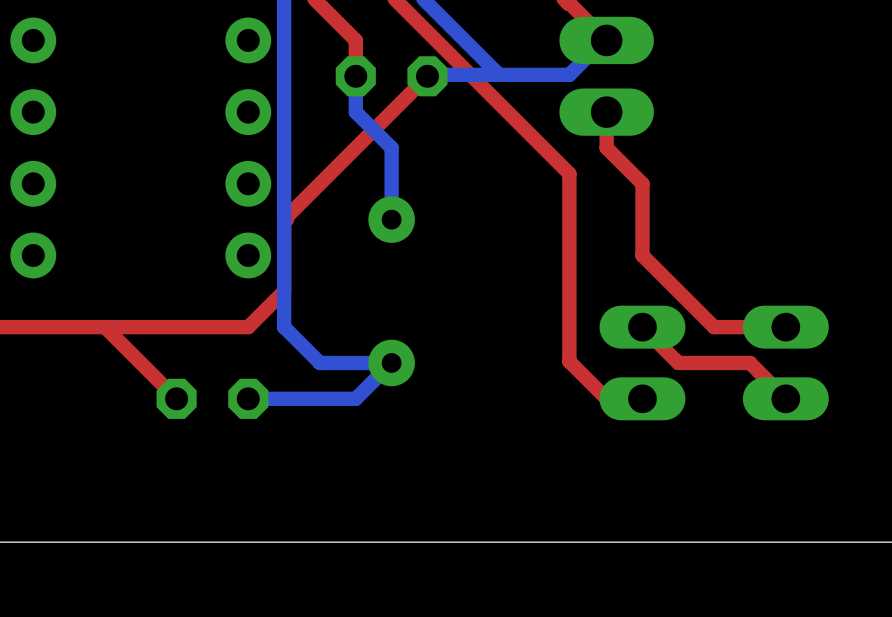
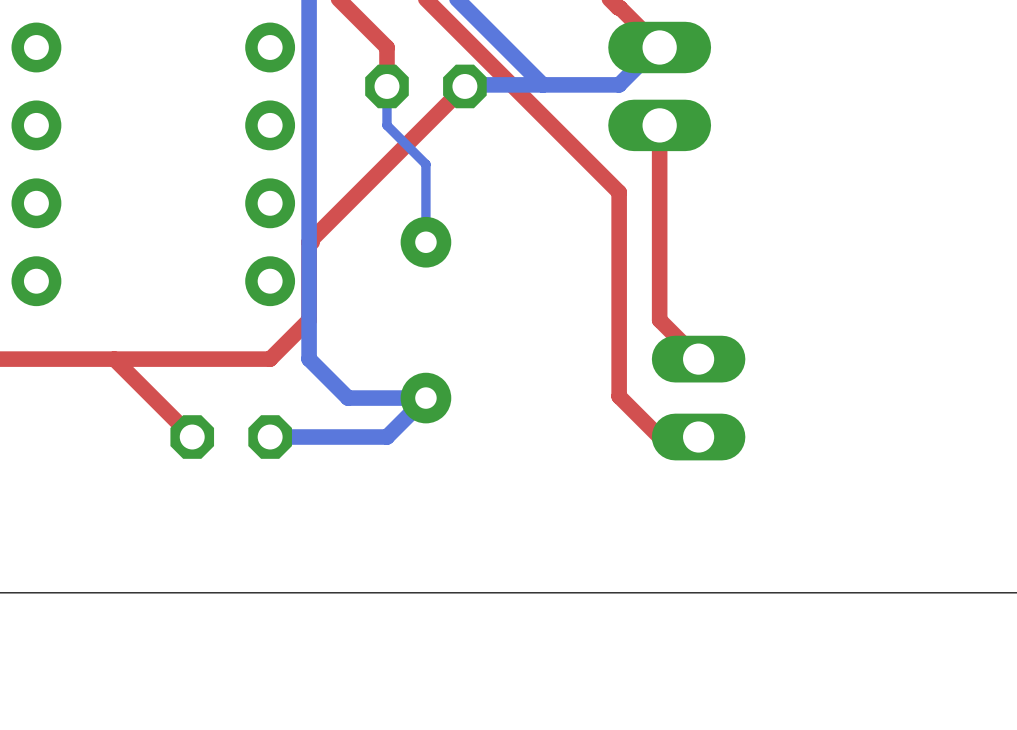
bottom track width: thick (355, 76) (355, 112) (391, 147) (391, 219) -> thin (386, 86) (386, 125) (425, 164) (425, 242)
top track: (606, 147) (642, 183) (642, 255) (714, 327) (785, 327) -> (659, 164) (659, 320) (698, 359)
top track: (642, 327) (678, 362) (749, 362) (785, 398) -> none
part: (785, 362) -> none

